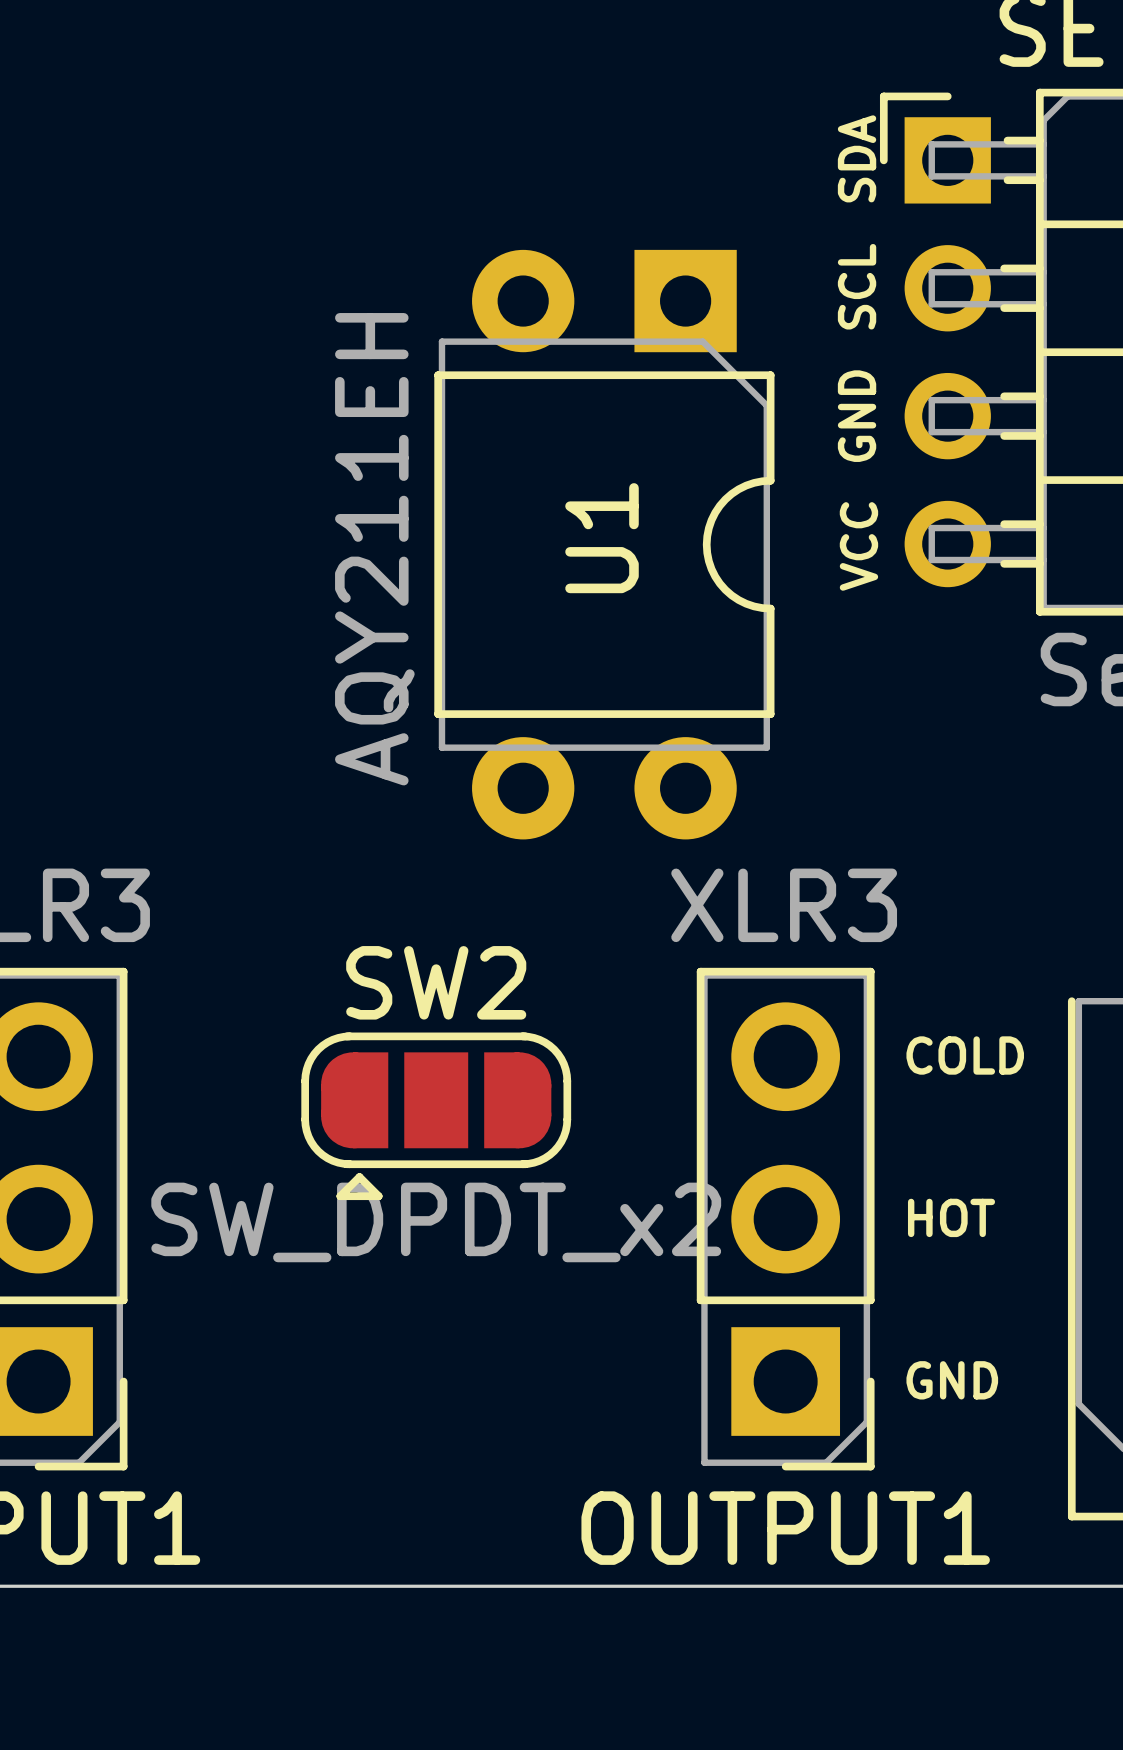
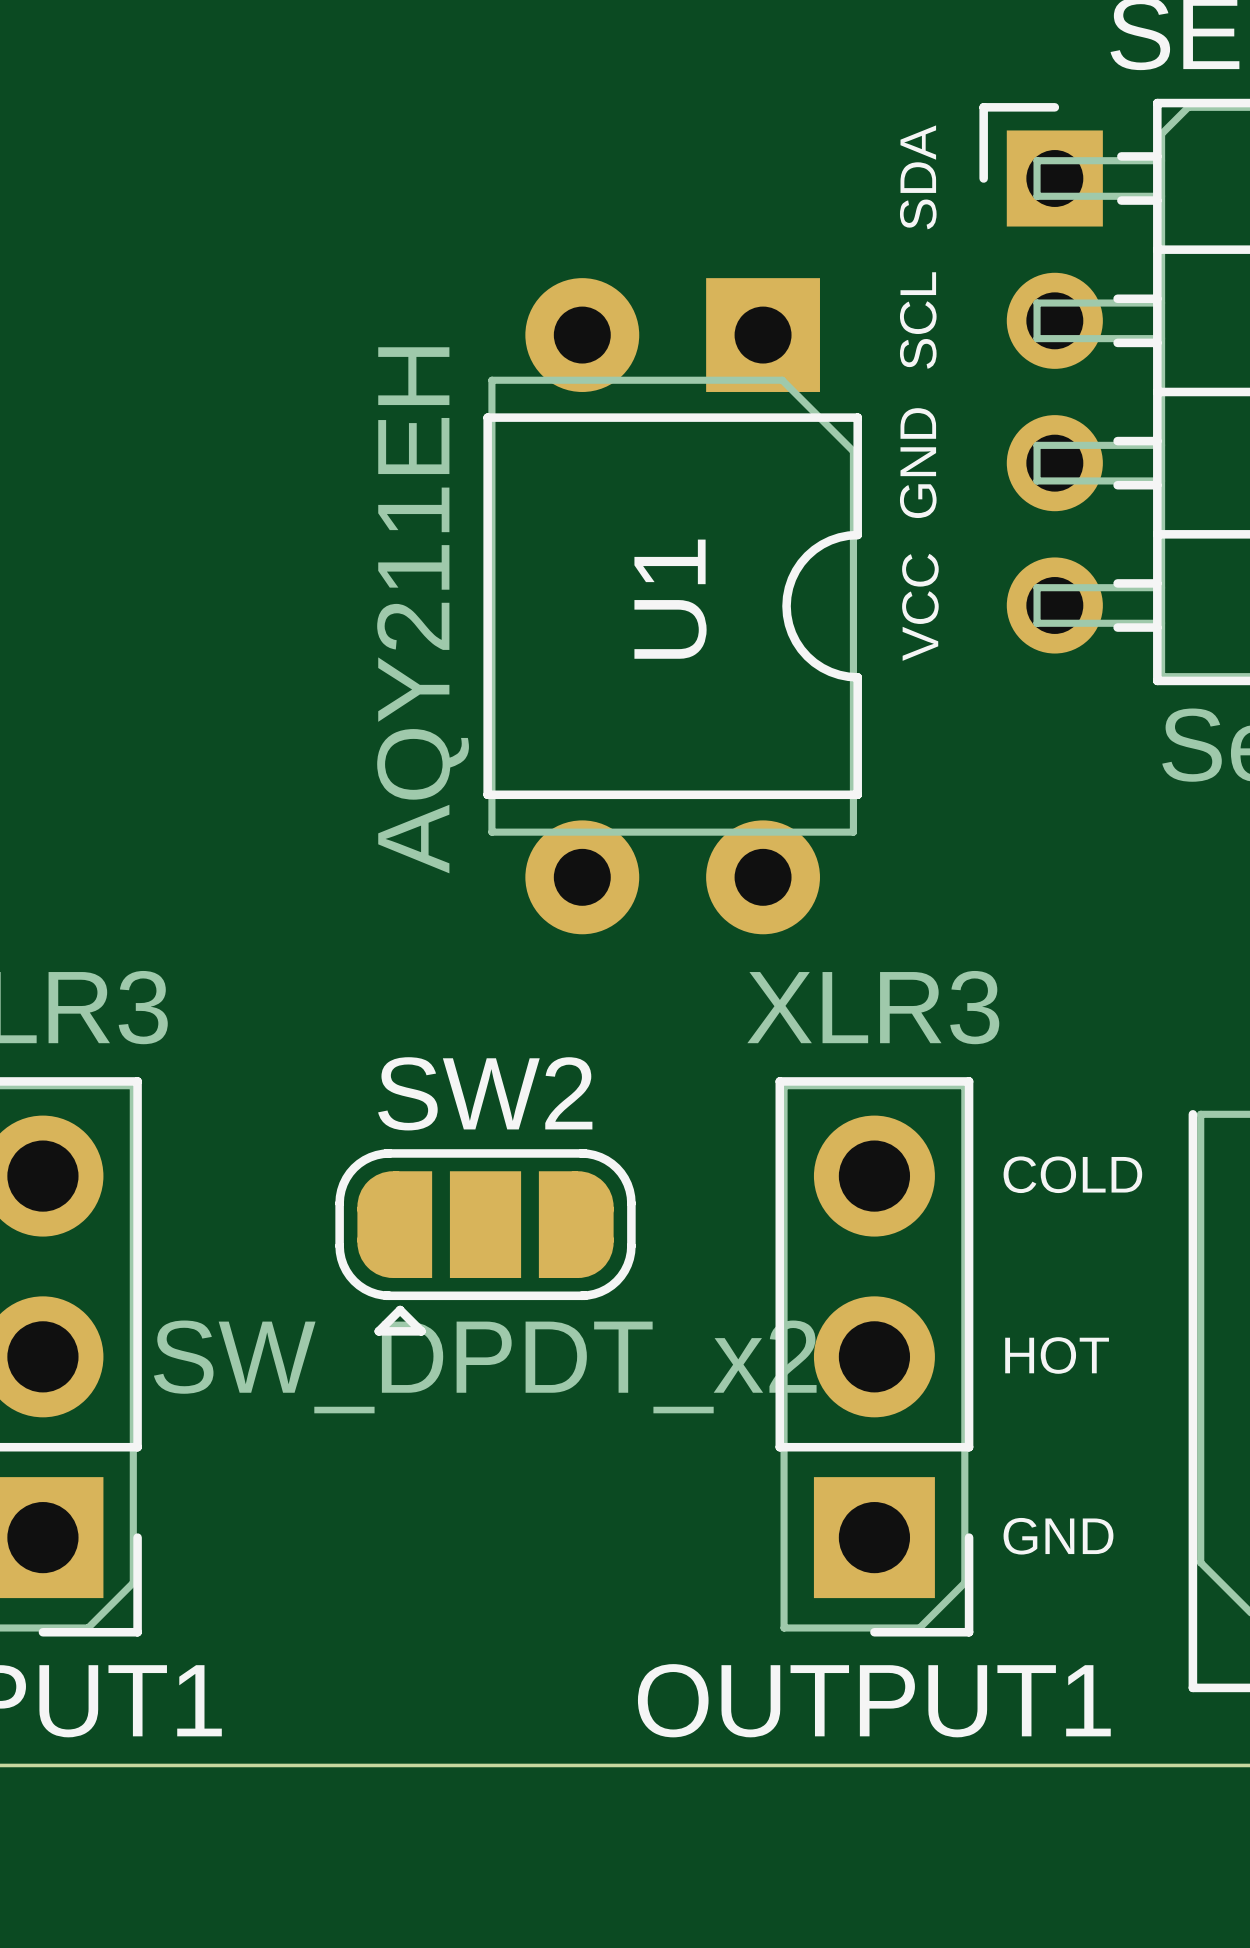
text position: SDA (857, 158) -> SDA (918, 177)
text position: SCL (857, 286) -> SCL (918, 320)
text position: GND (857, 416) -> GND (918, 463)
text position: VCC (858, 546) -> VCC (920, 607)

